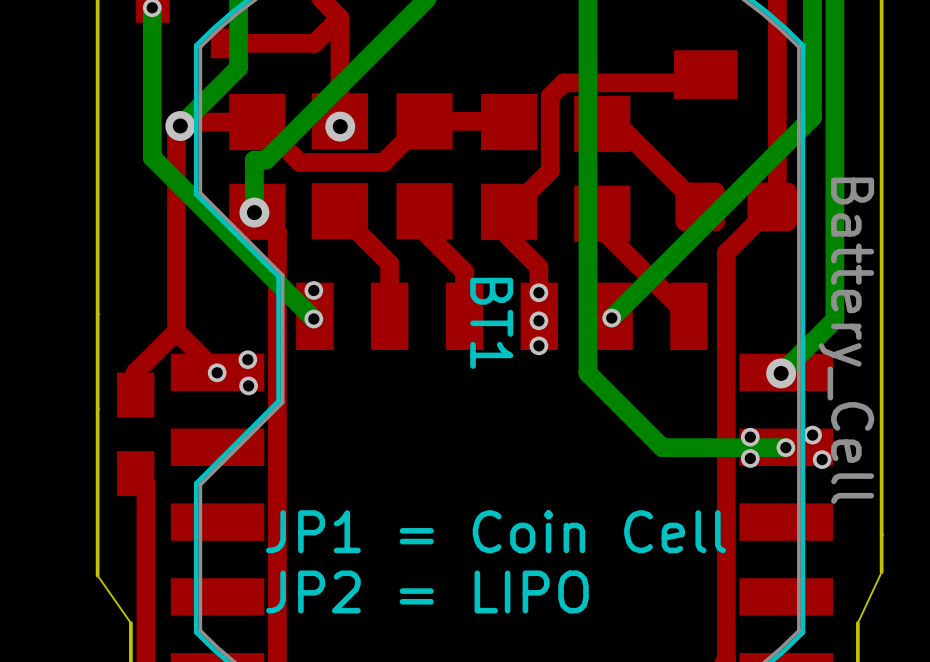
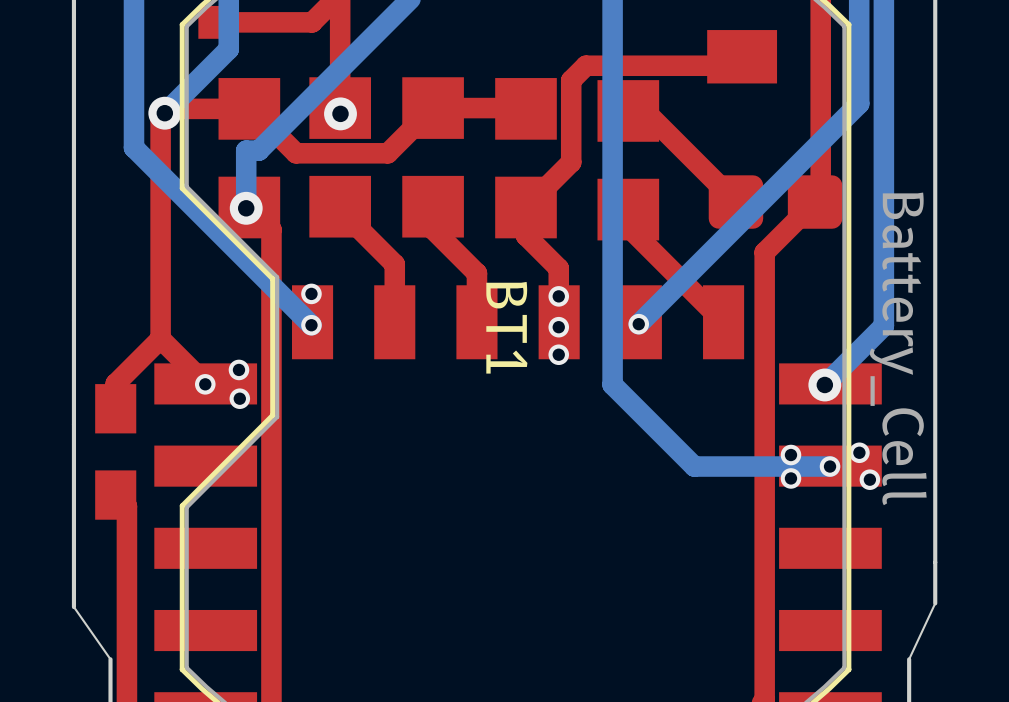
text: JP1 = Coin Cell (496, 531) -> none
text: JP2 = LIPO (427, 591) -> none

